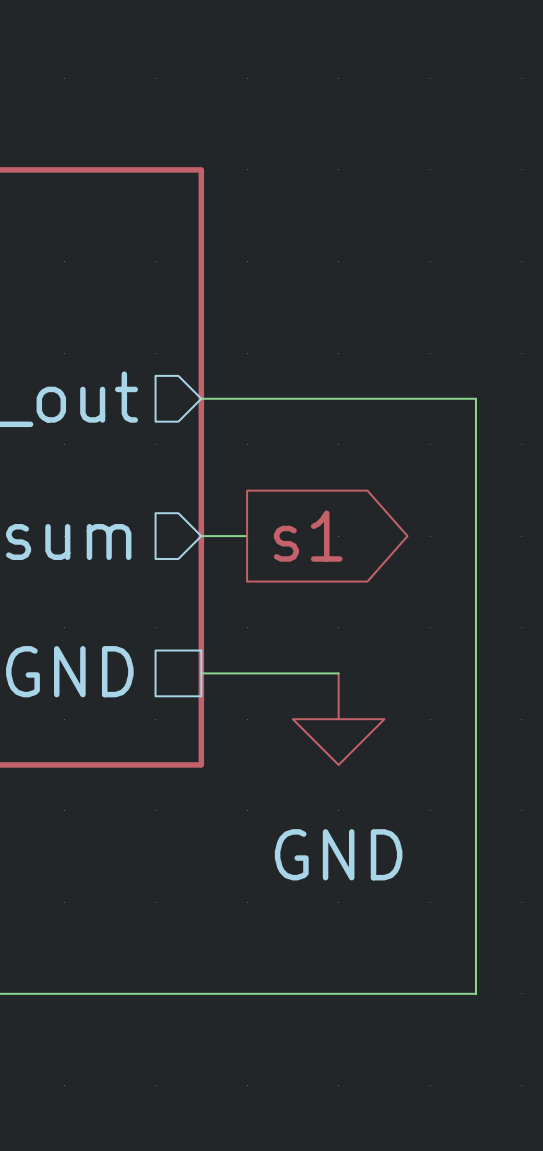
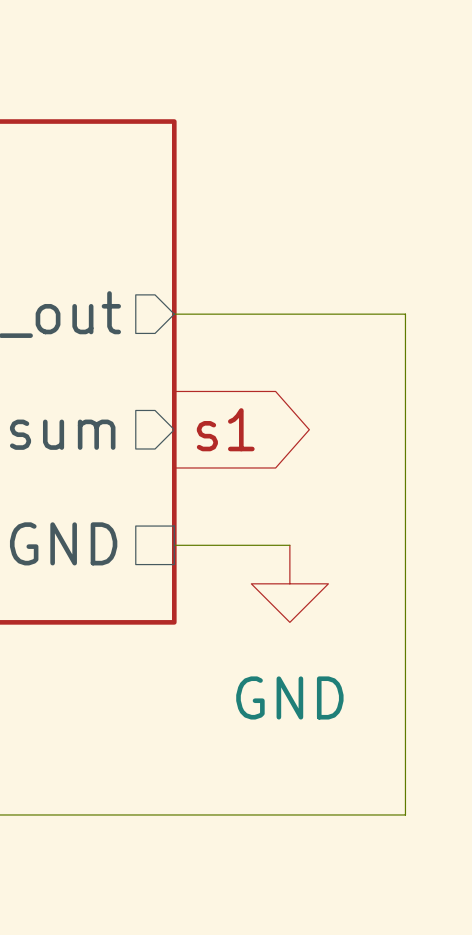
wire: (201, 536) (247, 536) -> none
global label position: s1 (308, 536) -> s1 (225, 429)

